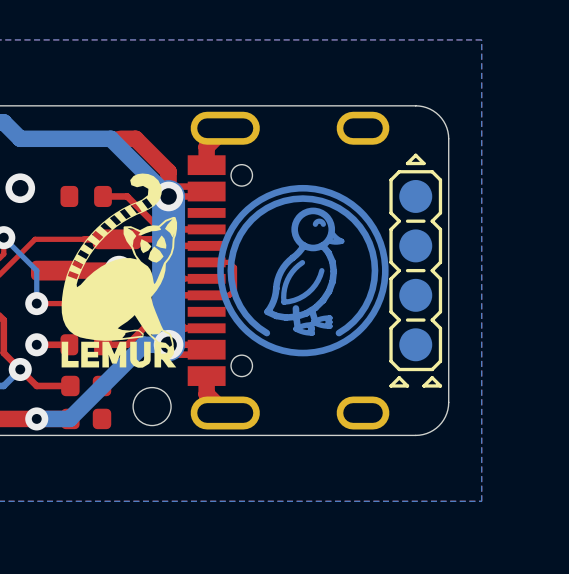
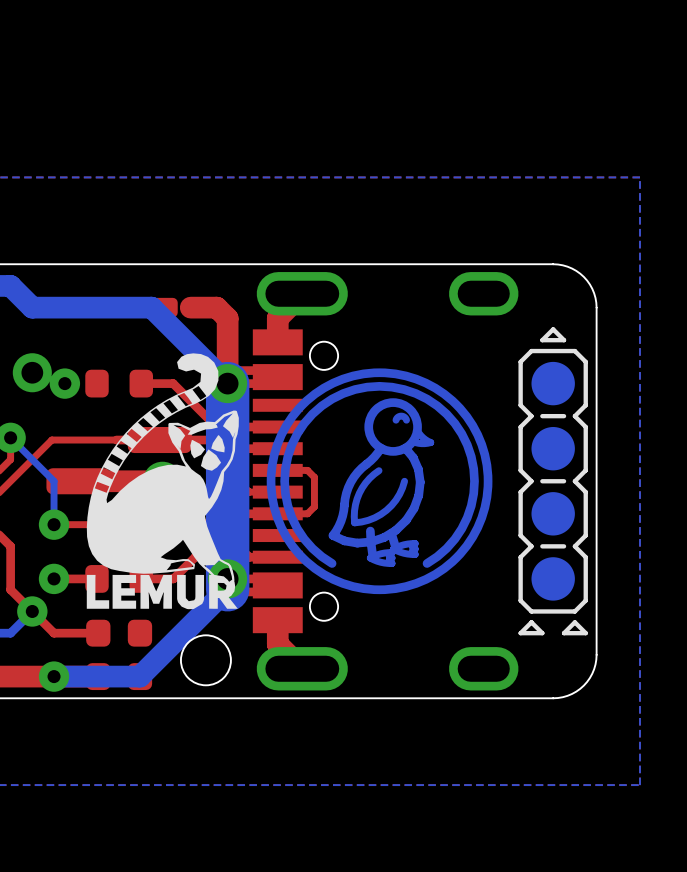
top track: (120, 138) (135, 138) (168, 171) -> (190, 307) (216, 307) (227, 318) (227, 351)
via: none -> (64, 383)
drawing position: (302, 270) -> (379, 481)
bottom track: (168, 344) (143, 344) (69, 418) -> (227, 578) (227, 589) (139, 676) (97, 676)

